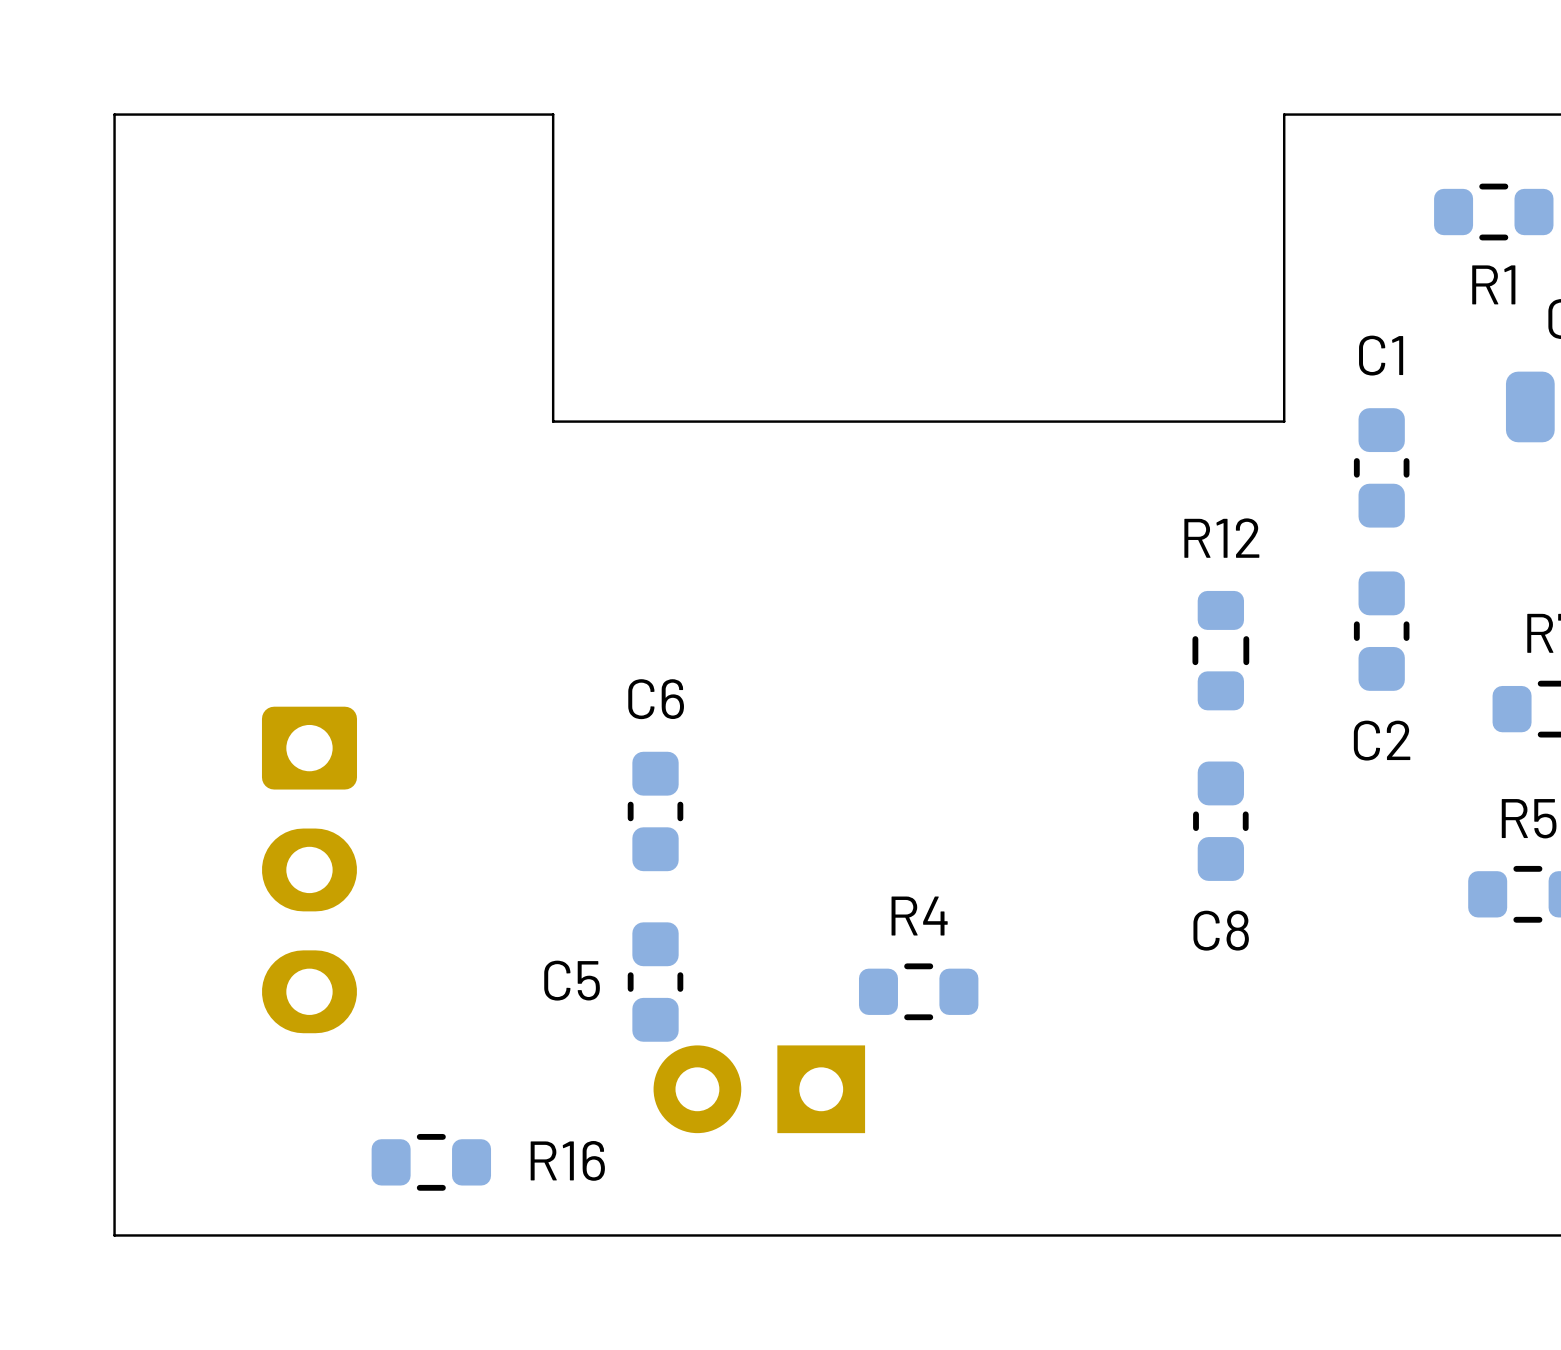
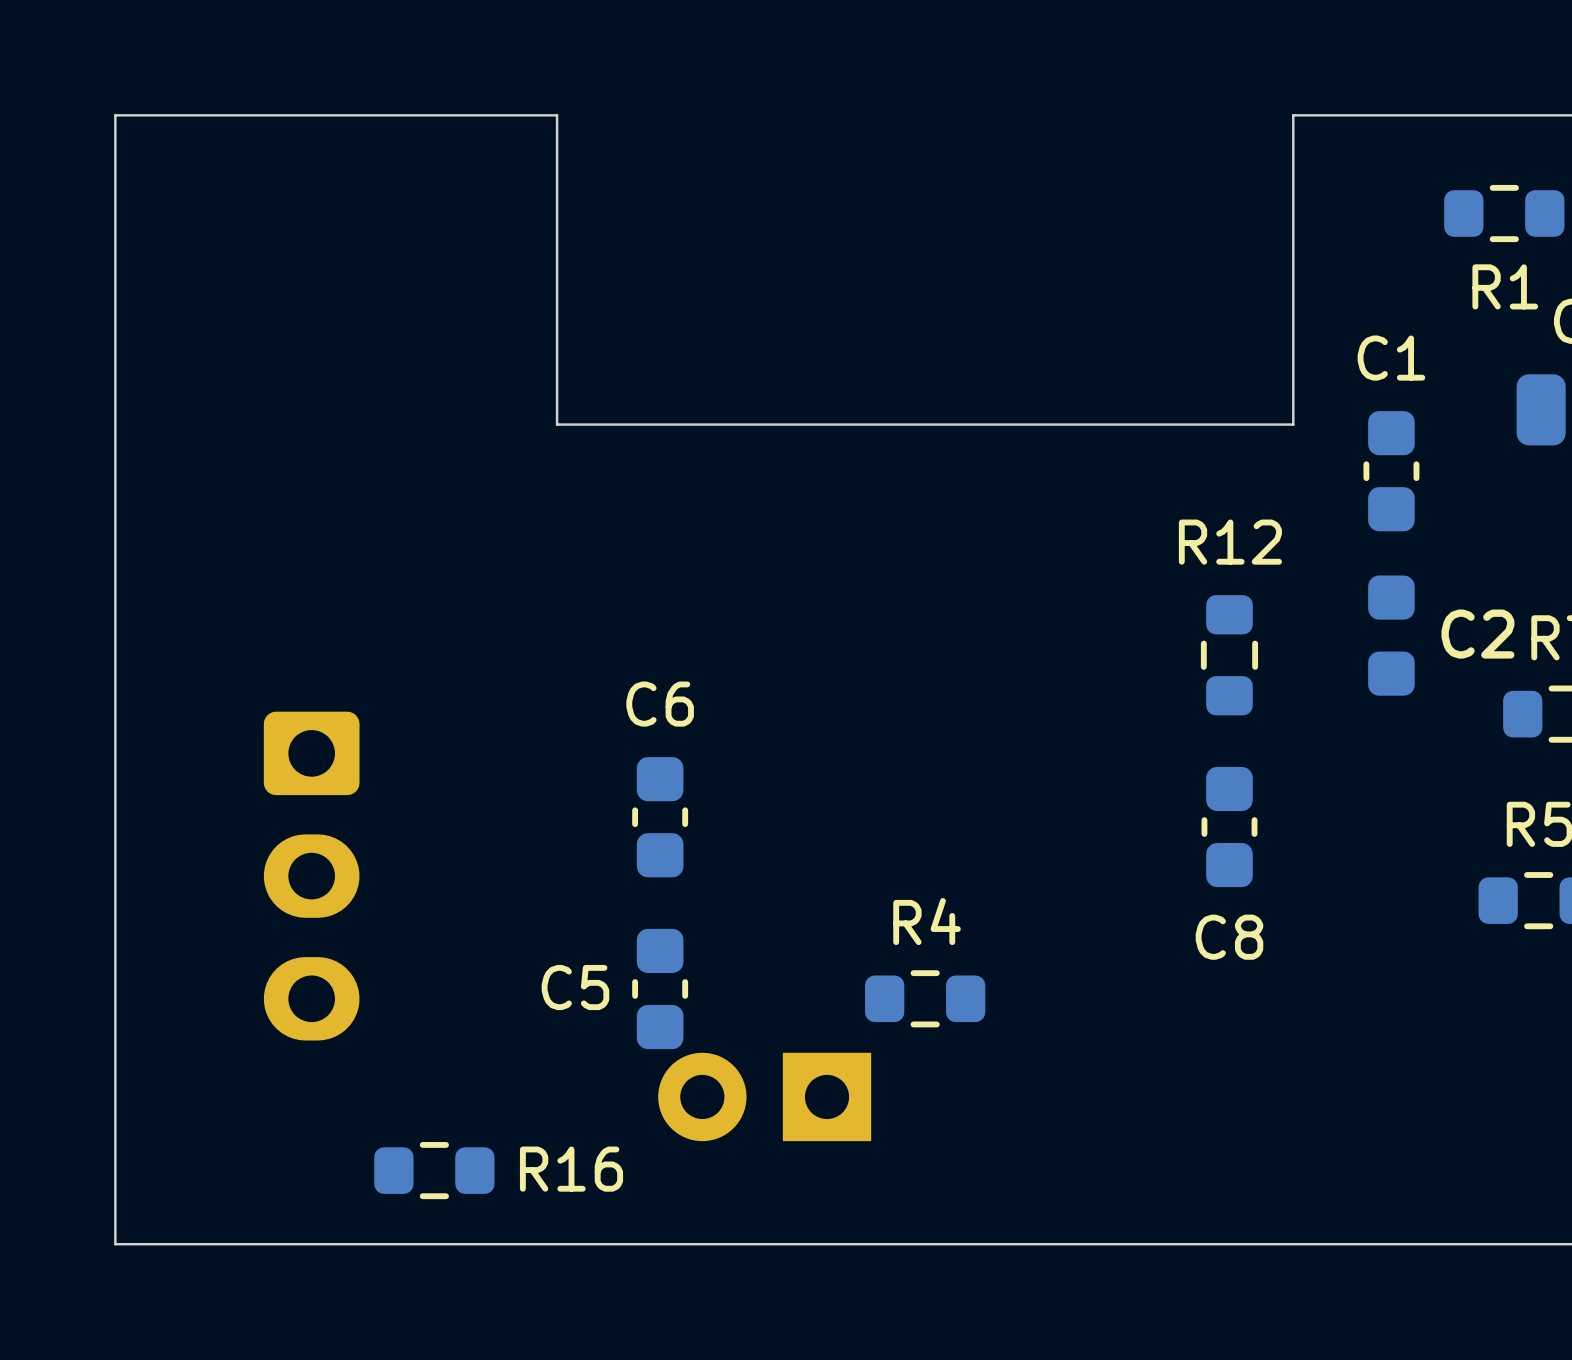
C2 footprint: [1353, 571, 1410, 691] -> [1368, 575, 1415, 696]
C2 name position: C2 (1382, 740) -> C2 (1477, 634)

